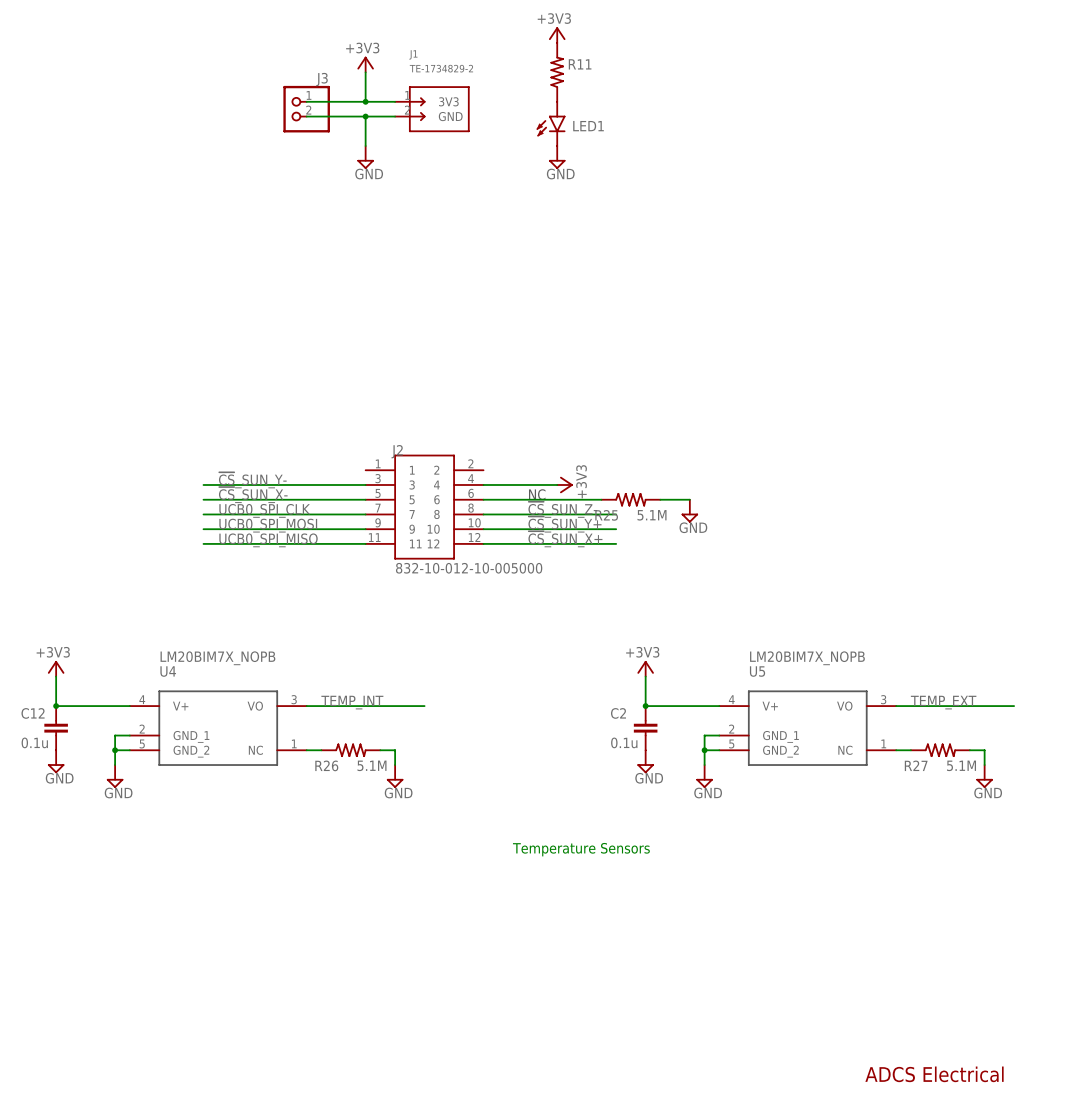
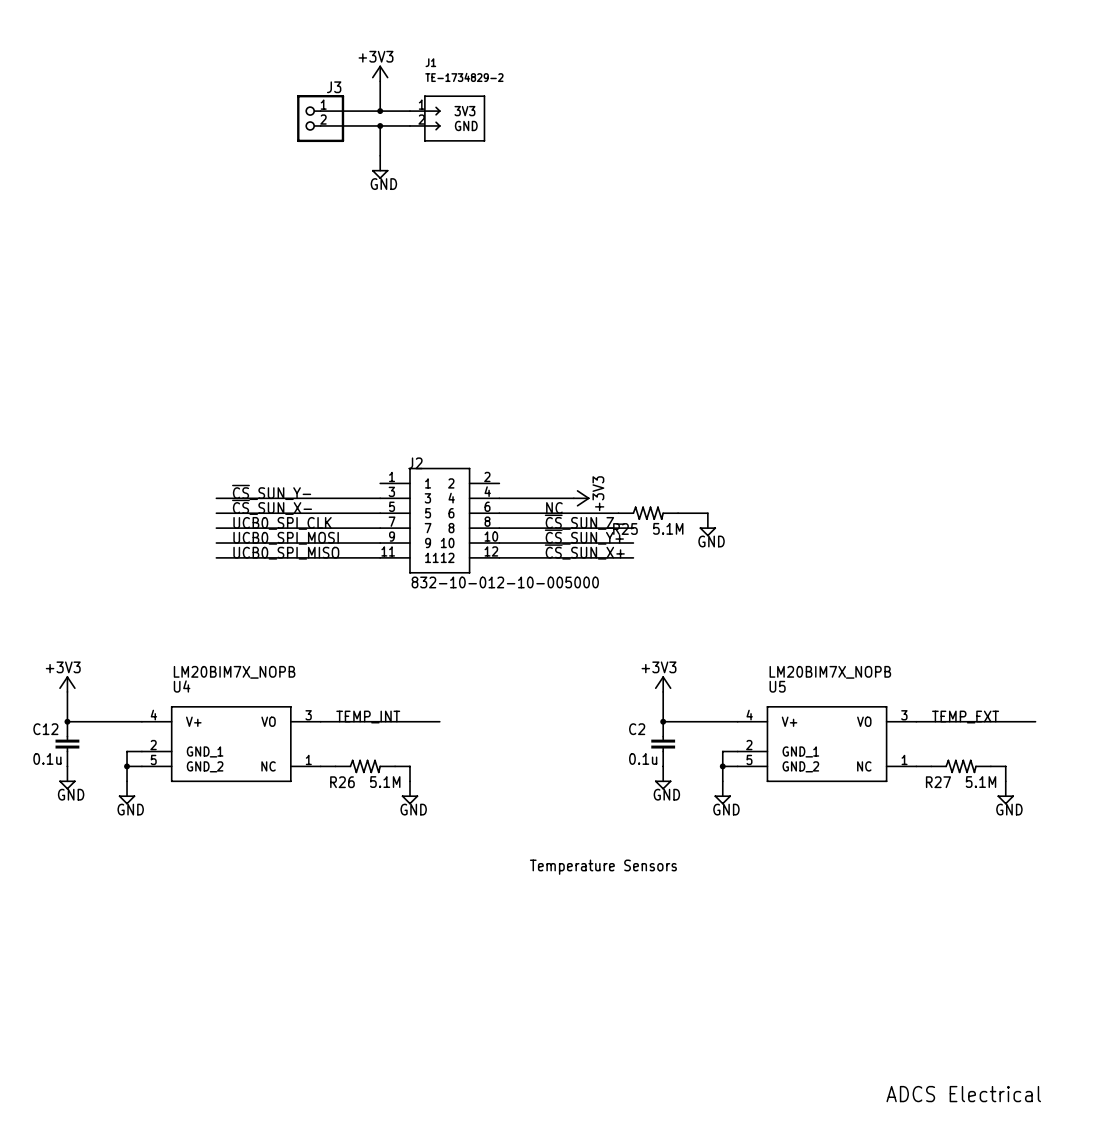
power symbol: +3V3 (557, 35) -> none
R11: (557, 72) -> none
LED1: (551, 123) -> none
power symbol: GND (557, 157) -> none

